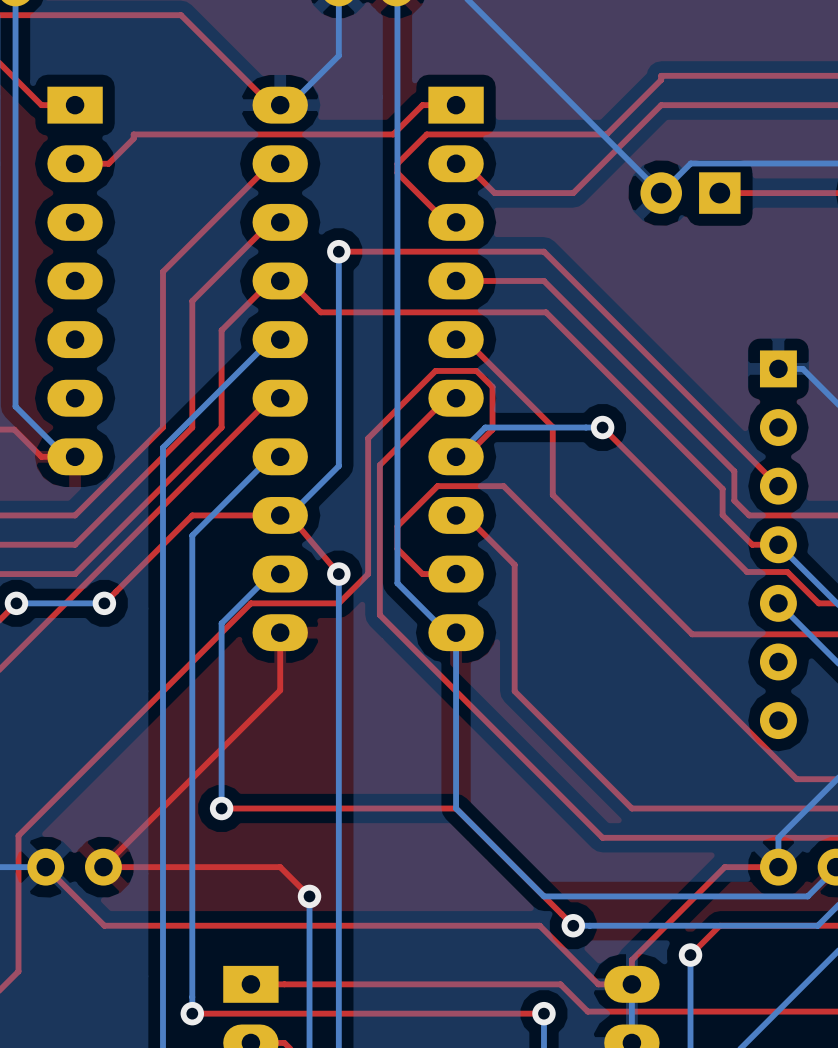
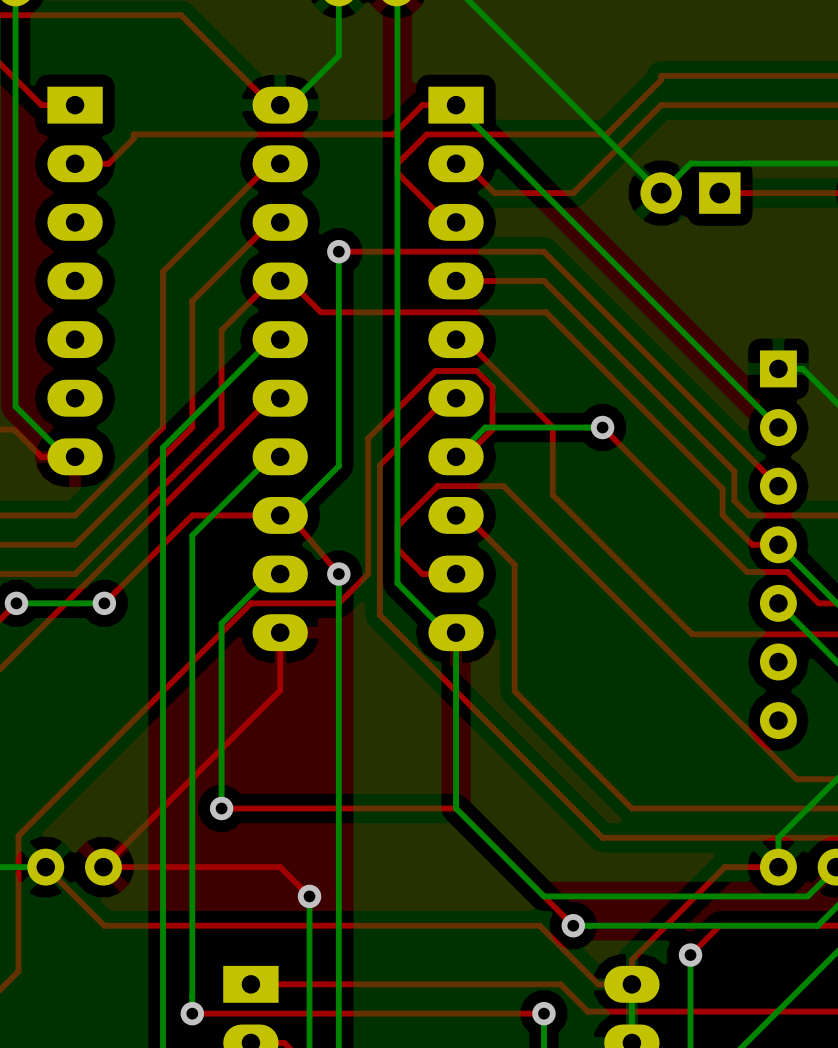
bottom track: none -> (456, 105) (778, 427)

